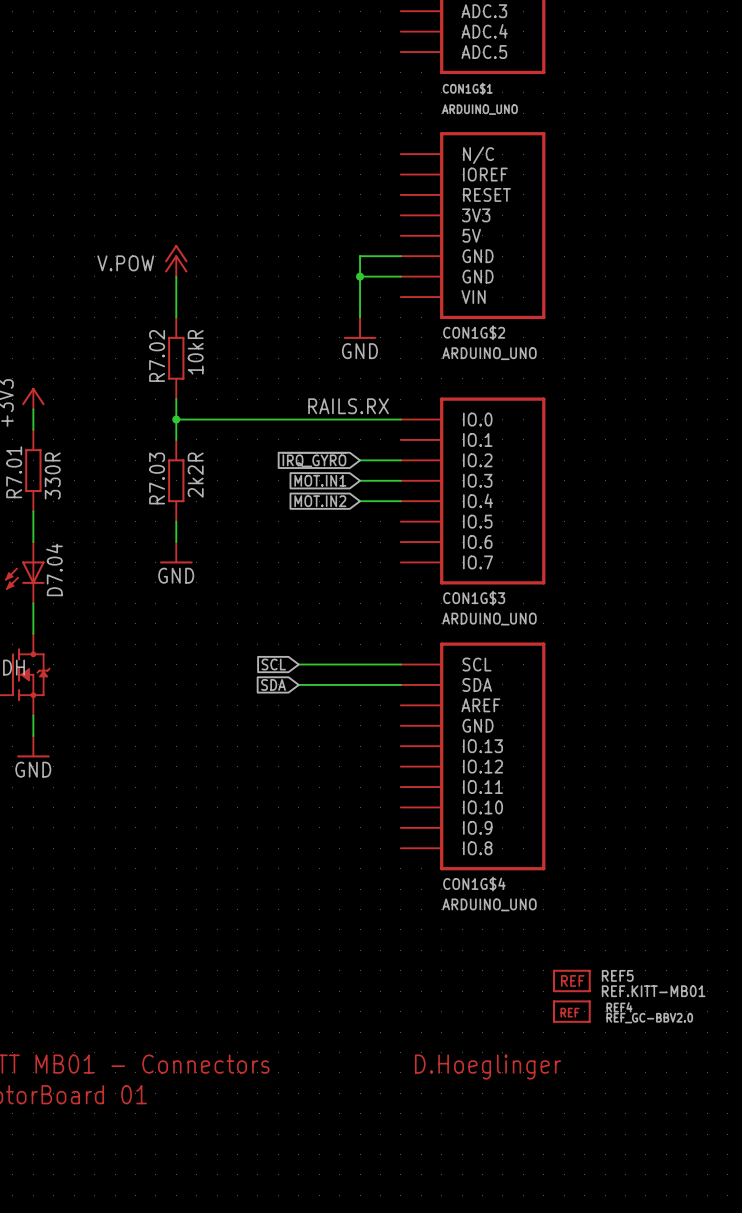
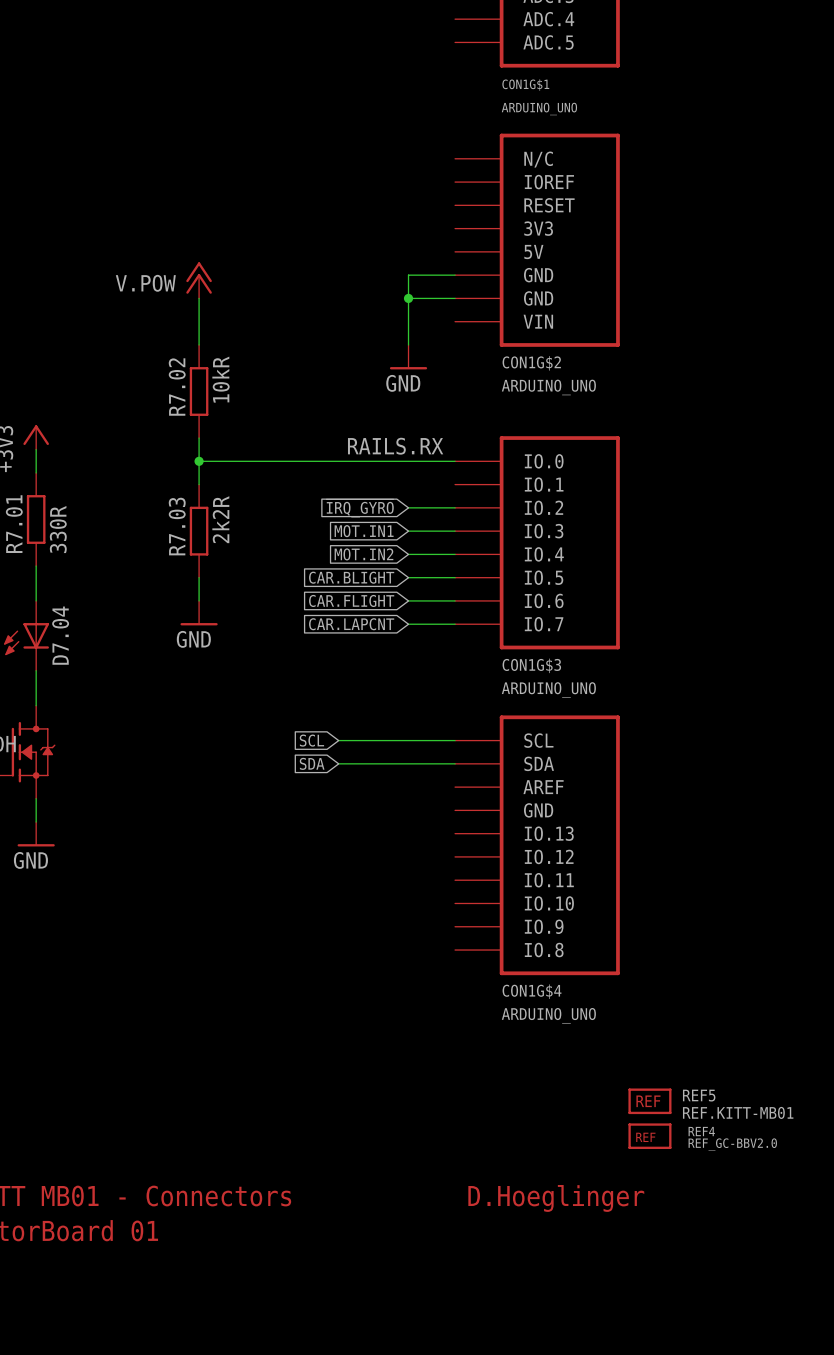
global label: none -> CAR.BLIGHT (351, 577)
wire: none -> (408, 577) (455, 577)
global label: none -> CAR.FLIGHT (351, 600)
wire: none -> (408, 600) (455, 600)
global label: none -> CAR.LAPCNT (351, 624)
wire: none -> (408, 624) (455, 624)

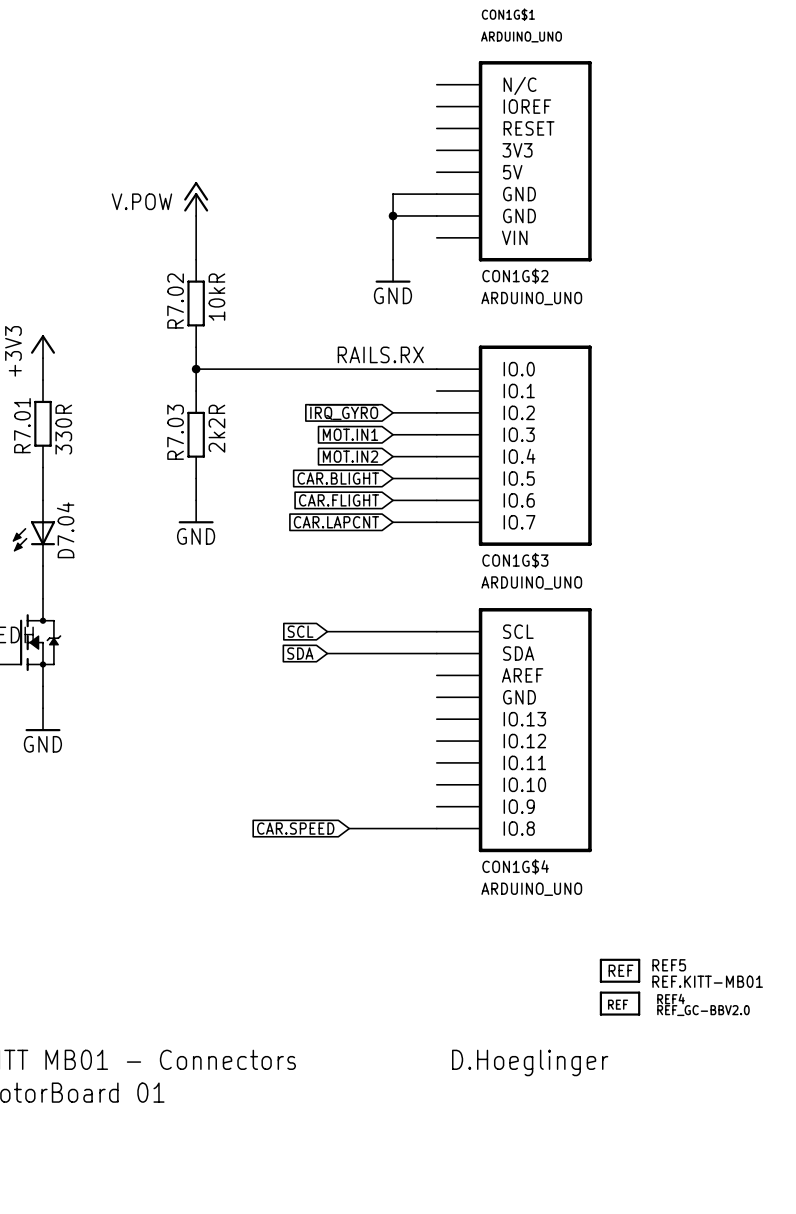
global label: none -> CAR.SPEED (295, 828)
wire: none -> (349, 828) (436, 828)

